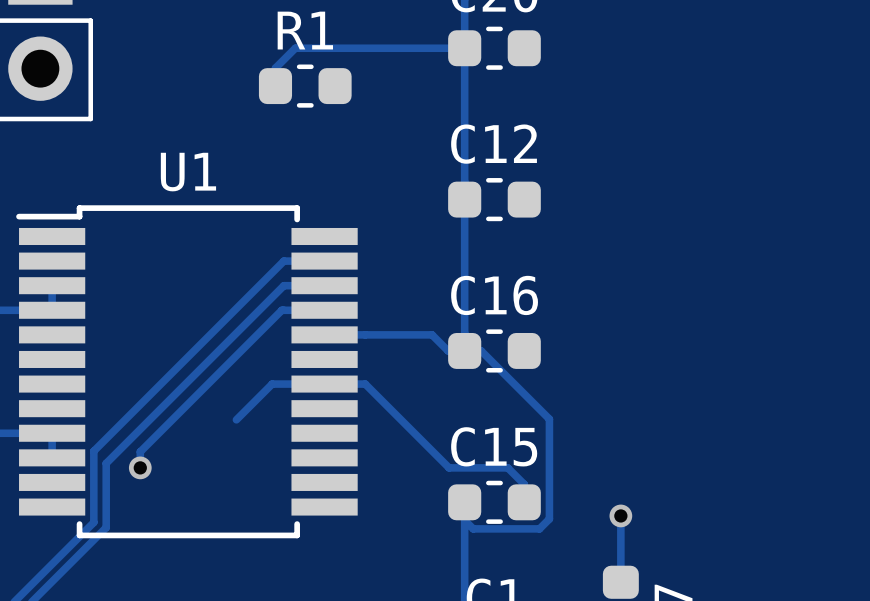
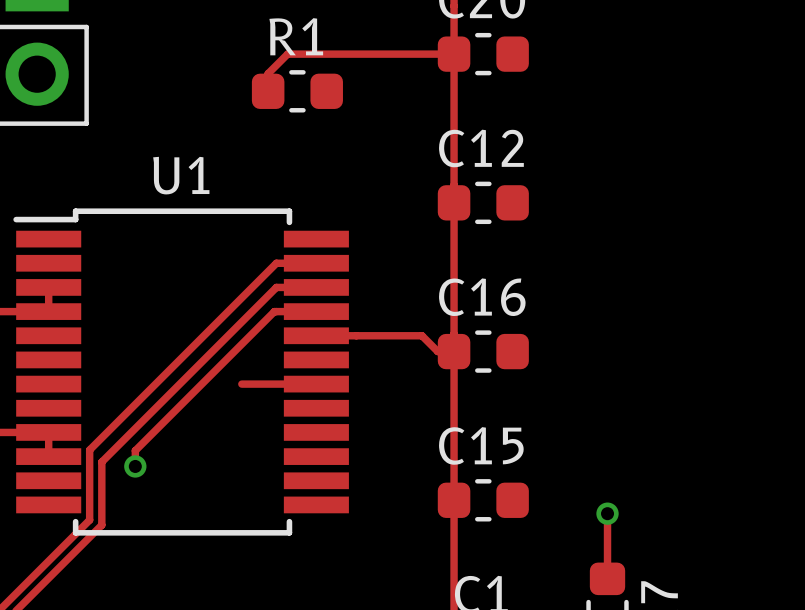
track: (464, 350) (481, 350) (549, 419) (549, 519) (539, 528) (473, 528) (464, 520) -> (454, 351) (454, 500)
track: (272, 384) (236, 419) -> (264, 384) (241, 384)
track: (324, 384) (365, 384) (449, 467) (507, 467) (524, 484) (524, 515) -> none

